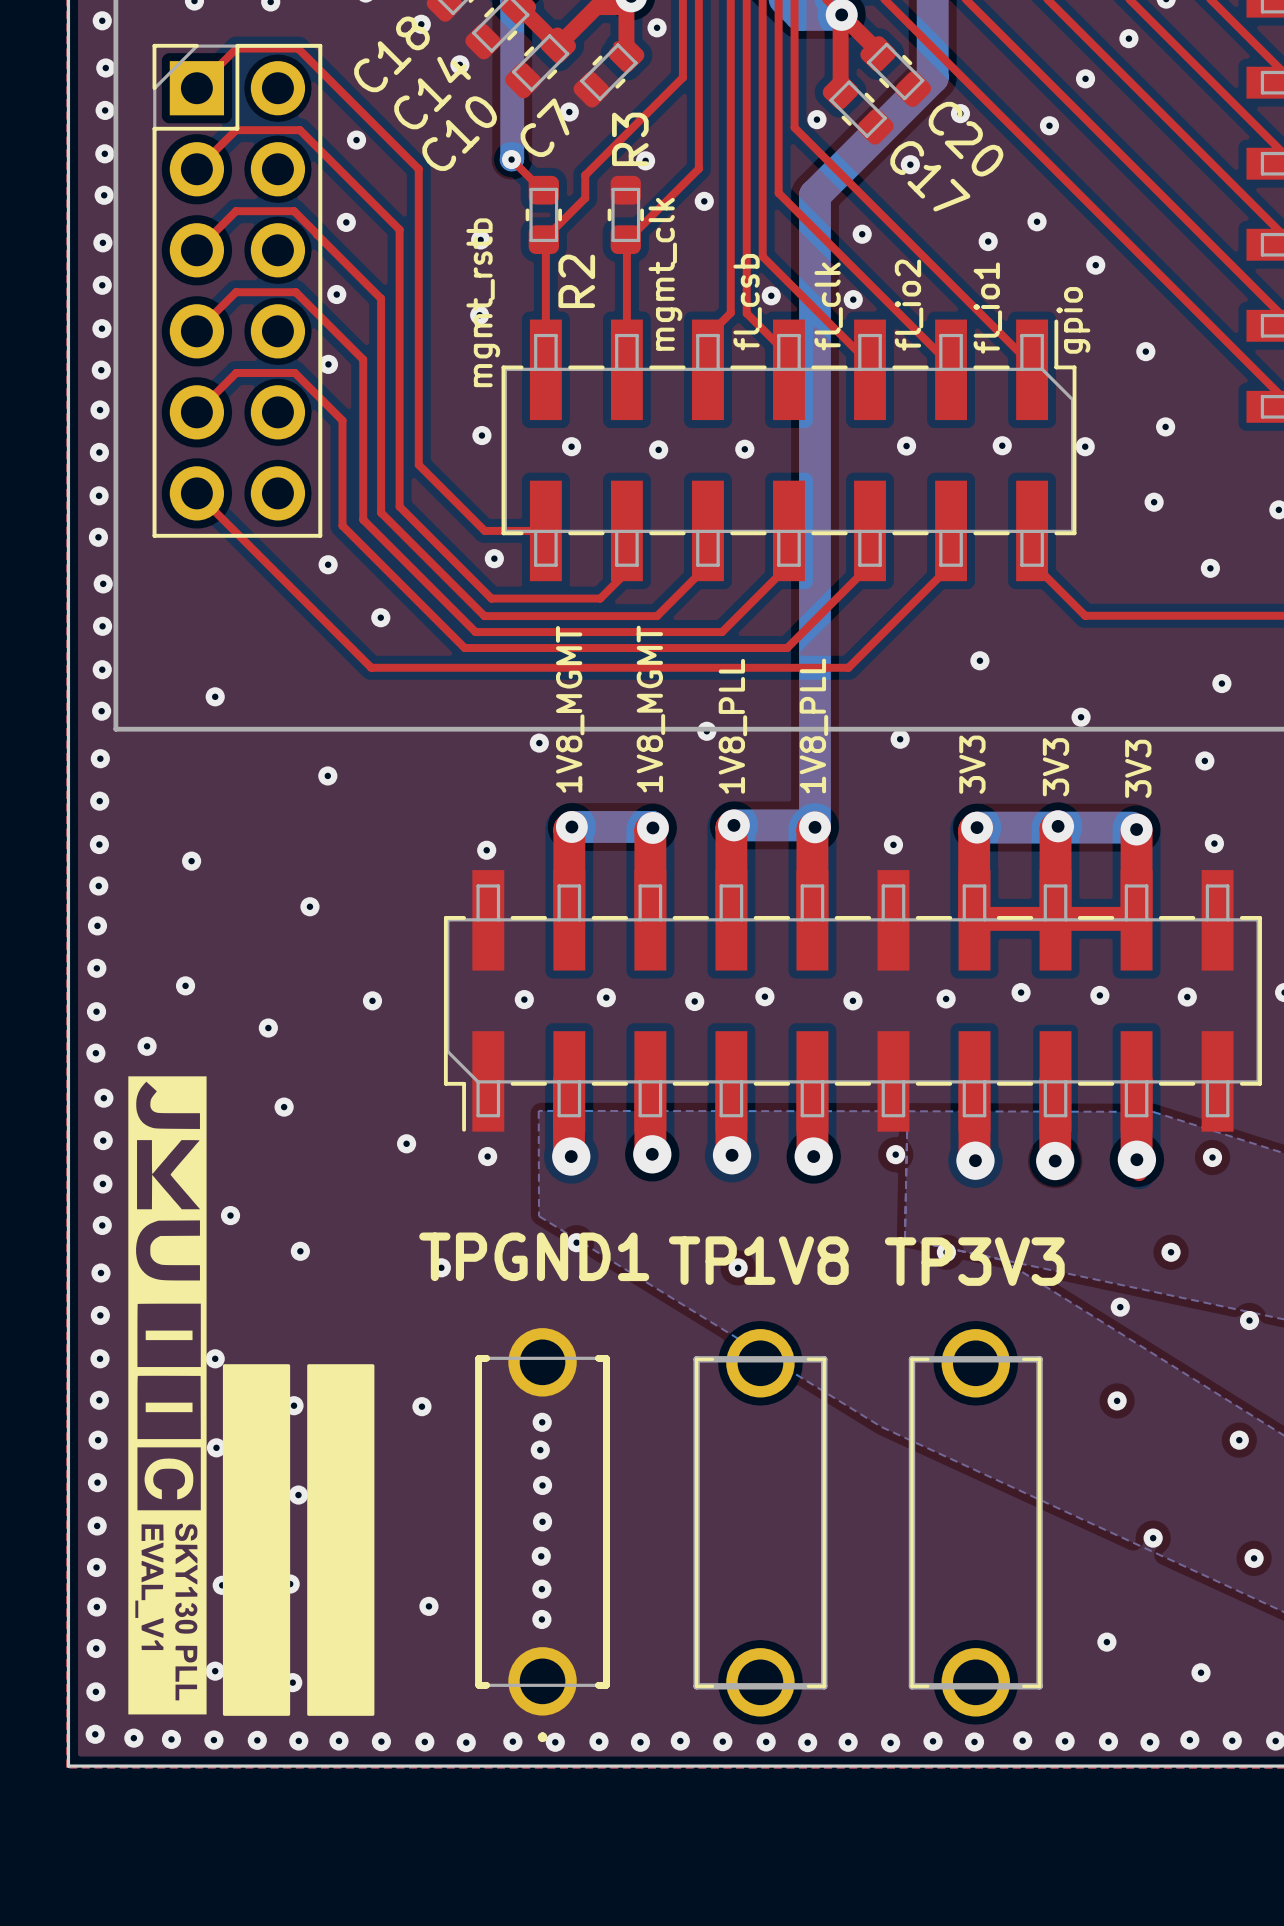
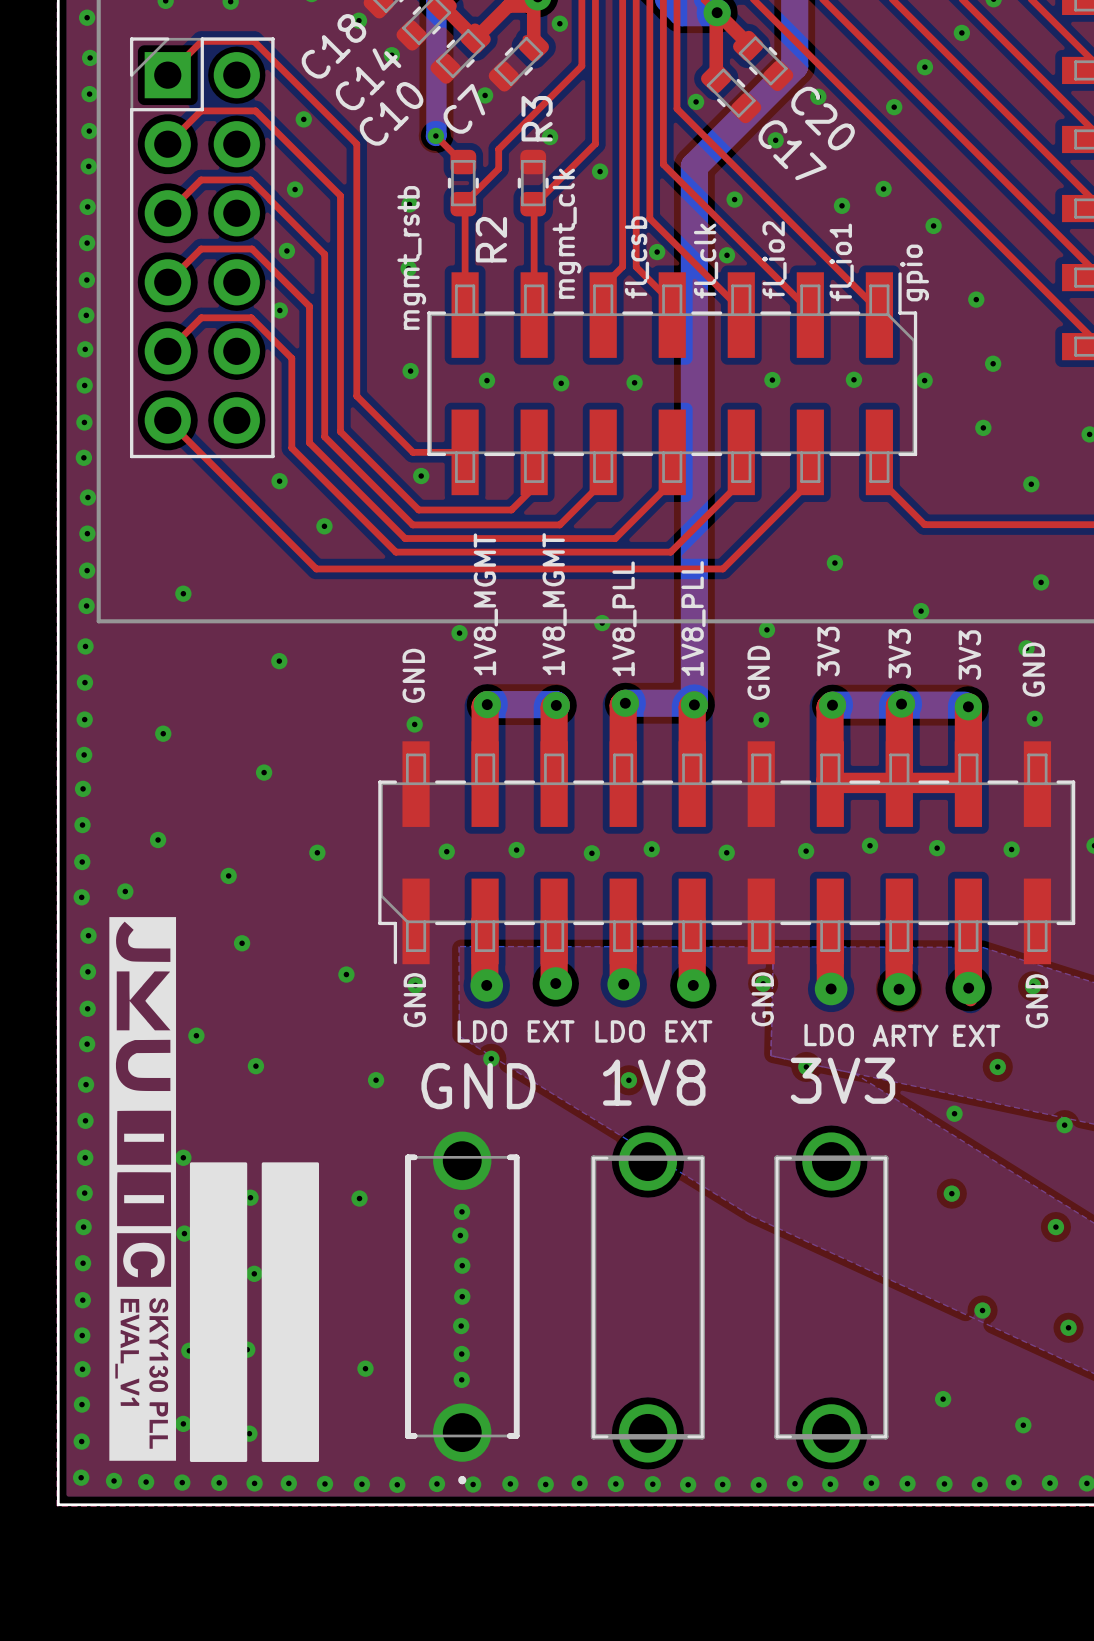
text: none -> GND (1033, 669)
text: none -> GND (758, 672)
text: none -> GND (413, 675)
text: none -> GND (762, 999)
text: none -> GND (414, 1000)
text: none -> GND (1037, 1001)
text: none -> LDO (482, 1031)
text: none -> EXT (551, 1031)
text: none -> LDO (620, 1031)
text: none -> EXT (688, 1031)
text: none -> LDO (829, 1035)
text: none -> ARTY (905, 1035)
text: none -> EXT (976, 1035)
TPGND1 name: TPGND1 (534, 1256) -> none
TP1V8 name: TP1V8 (758, 1260) -> none
TP3V3 name: TP3V3 (974, 1261) -> none
text: none -> 3V3 (843, 1080)
text: none -> 1V8 (654, 1082)
text: none -> GND (478, 1086)

